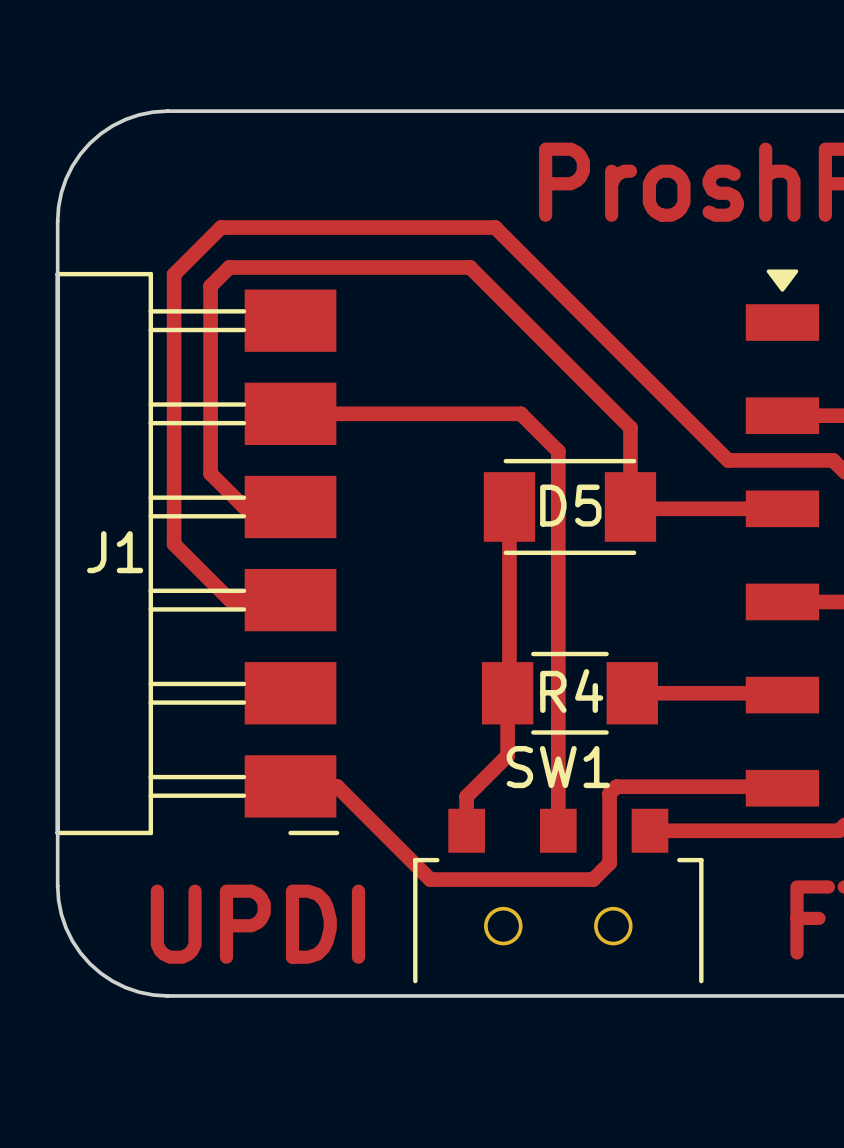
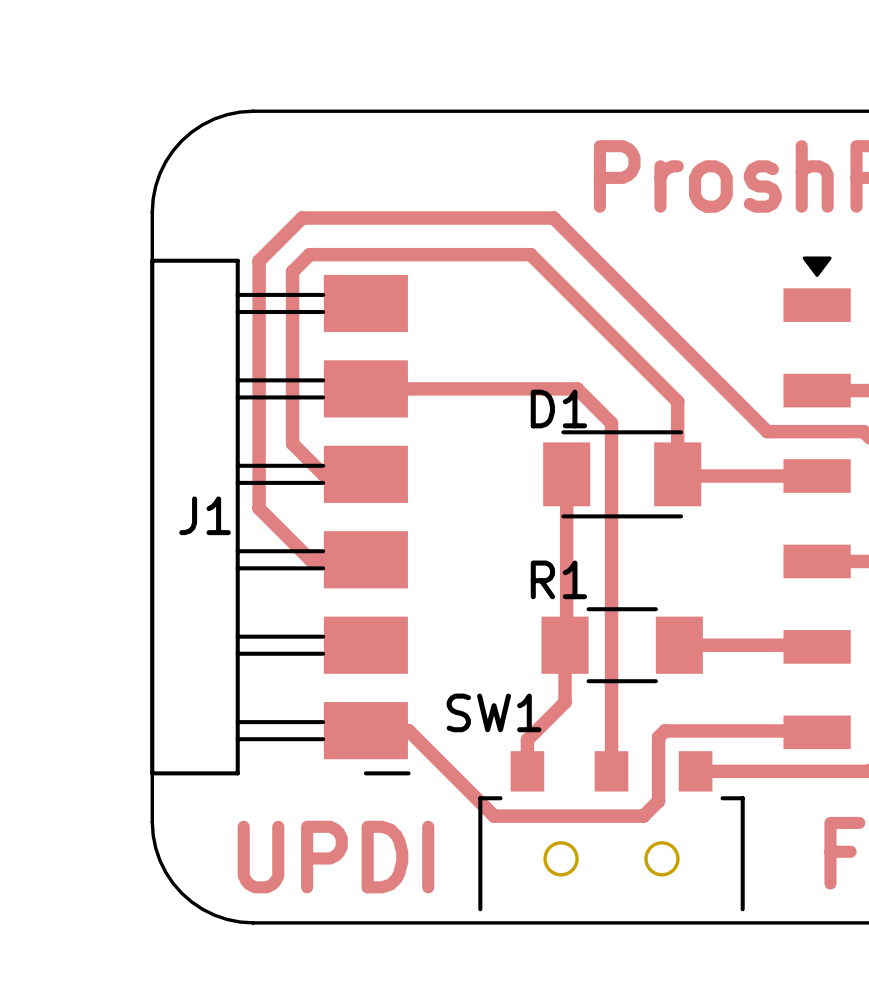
D5 name: D5 (570, 505) -> D1 (558, 409)
R4 name: R4 (571, 691) -> R1 (558, 579)
SW1 name position: SW1 (558, 767) -> SW1 (494, 712)

